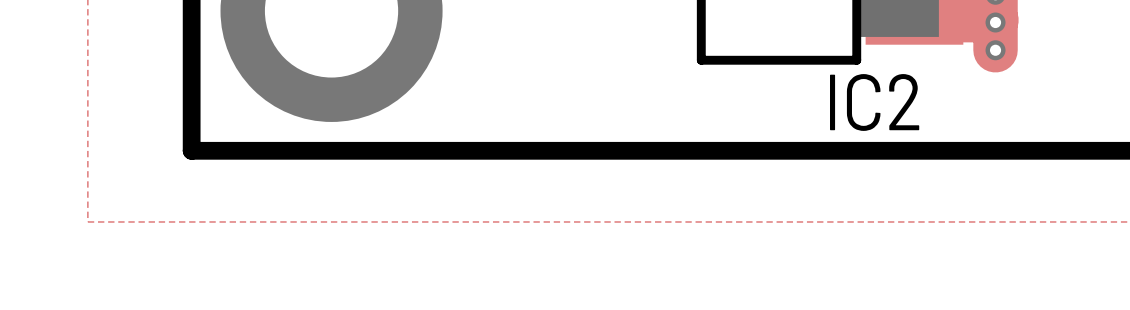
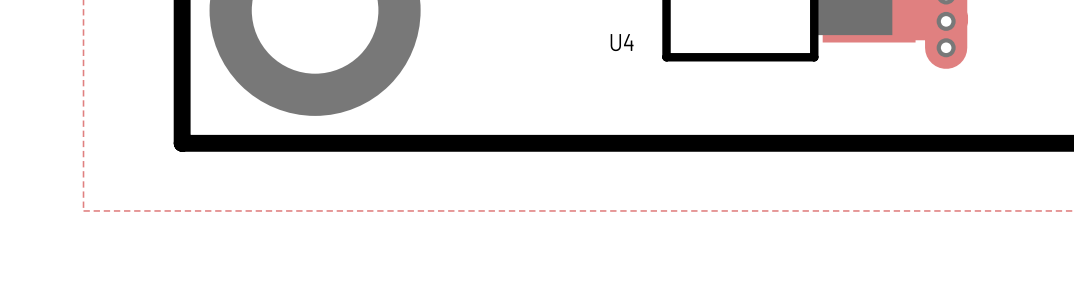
IC2 name: IC2 (874, 102) -> U4 (622, 42)

